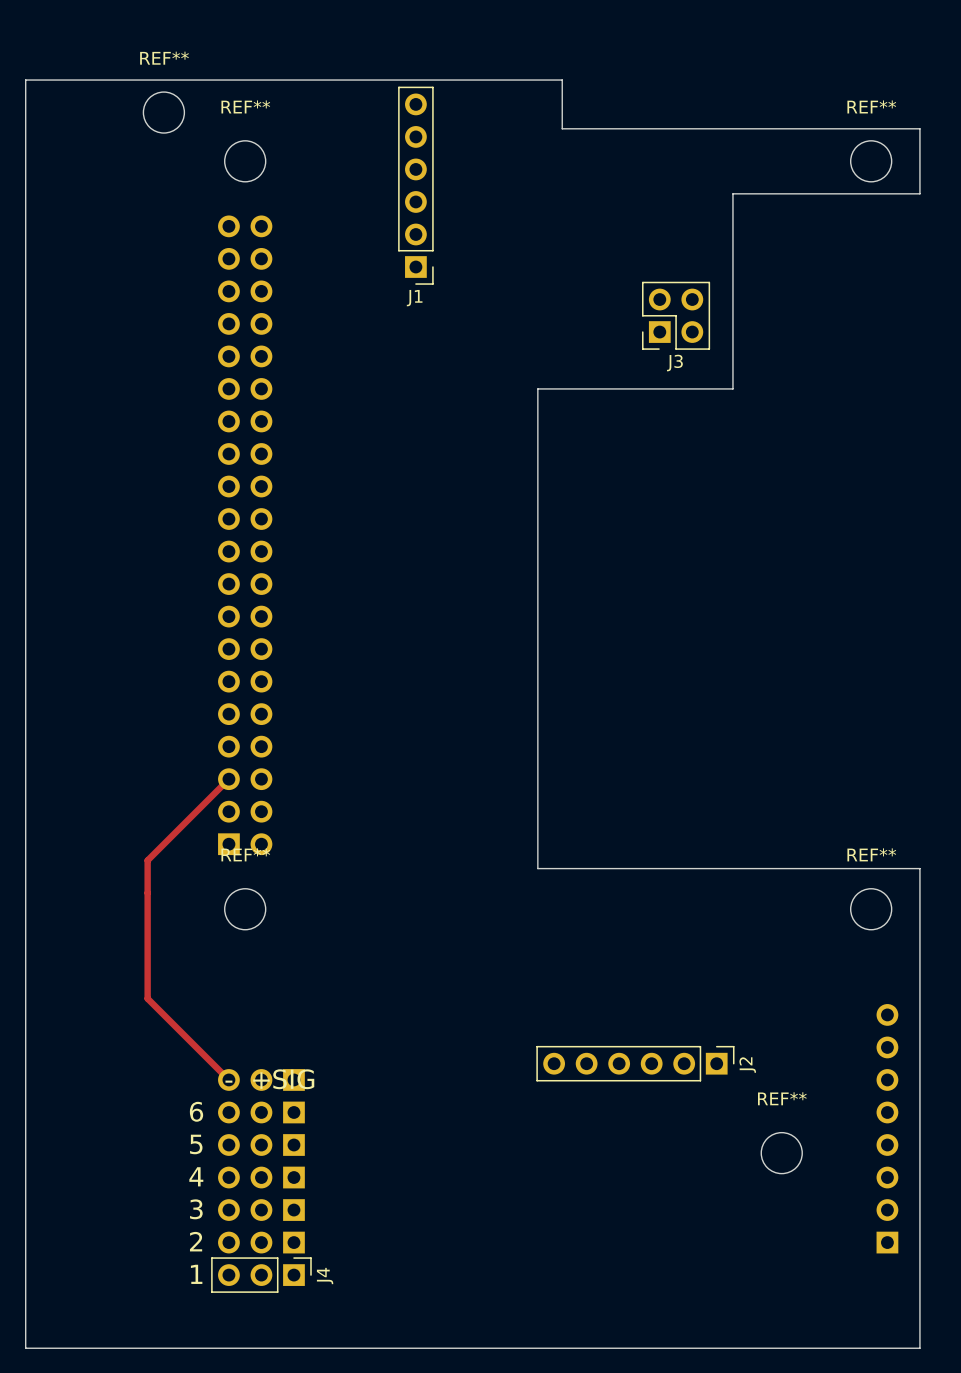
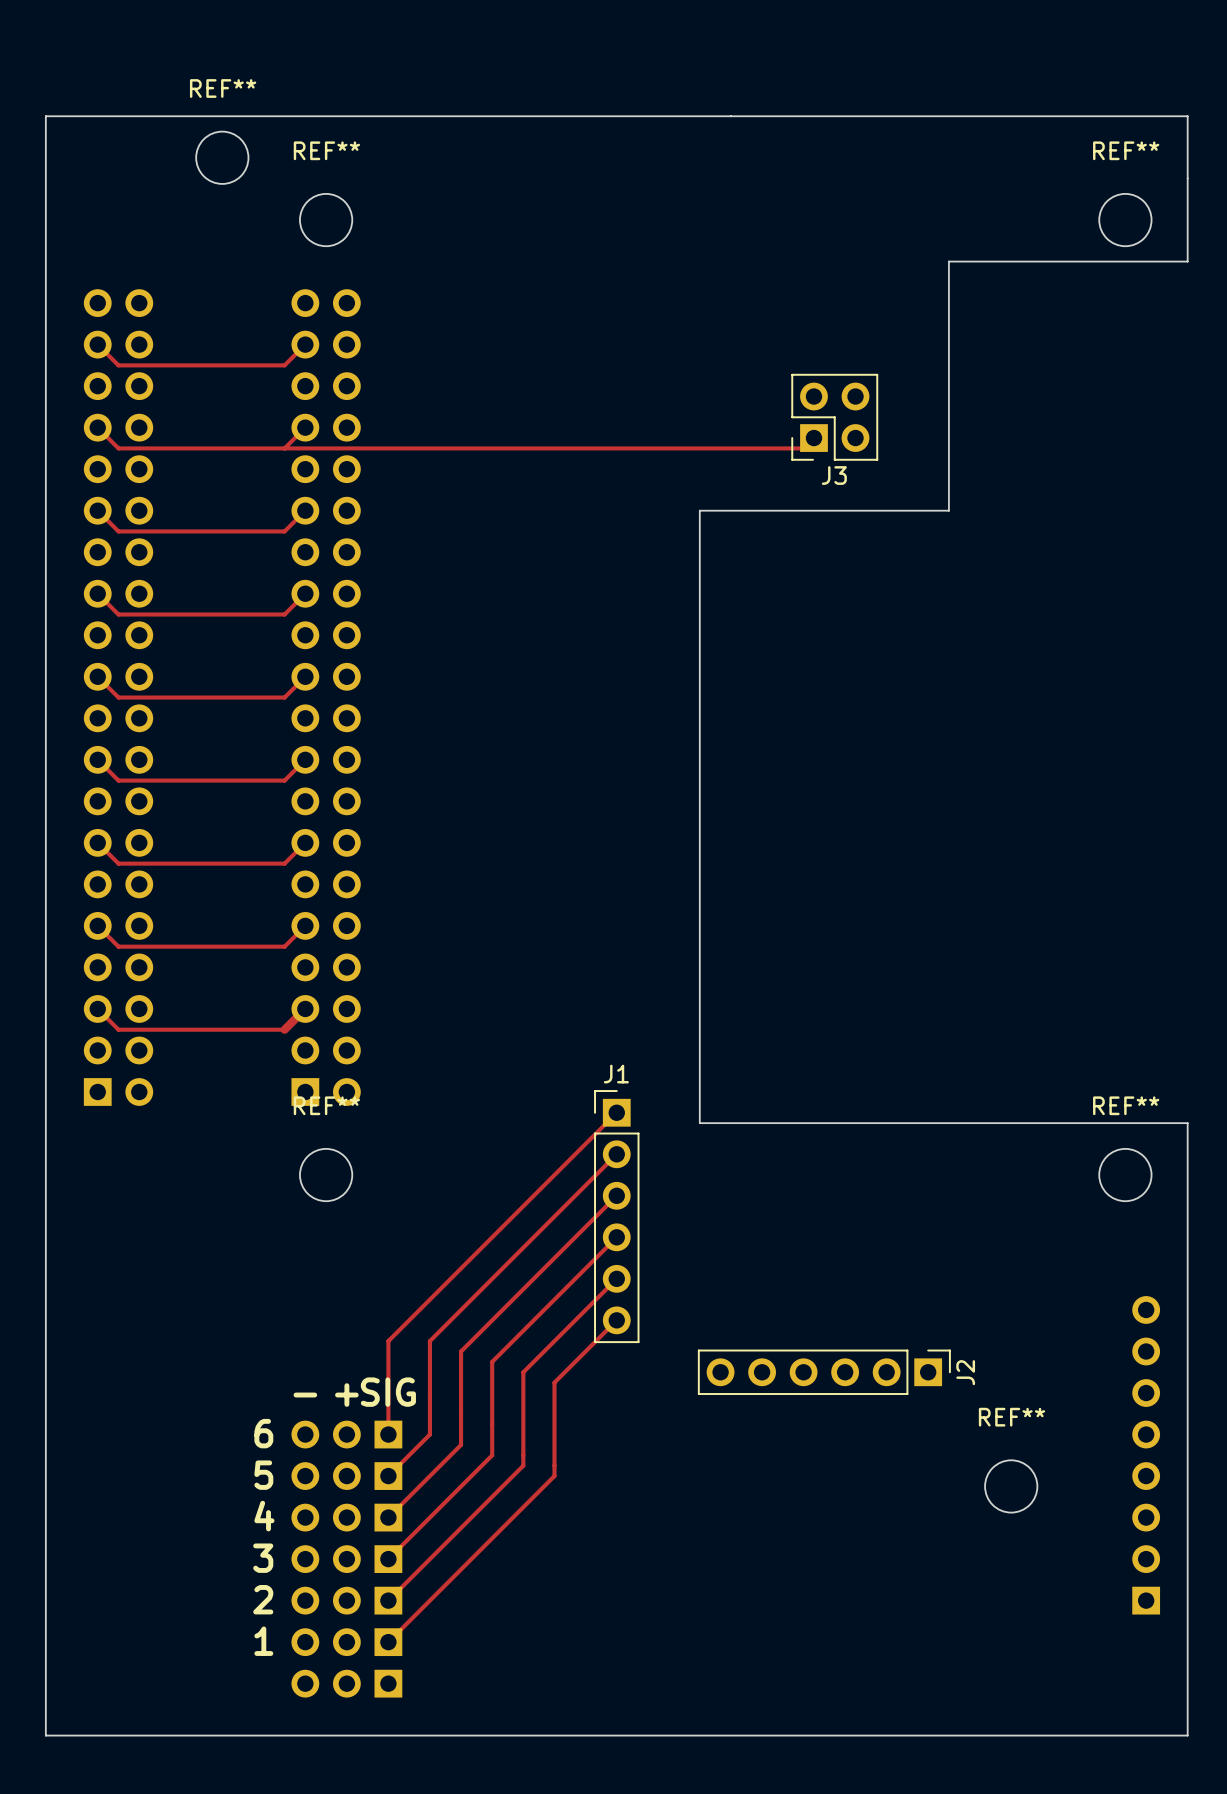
board edge: (562, 80) (562, 128) (919, 128) -> (730, 116) (1187, 116) (1187, 178)
J1 rotation: 0° (415, 185) -> 180° (616, 1216)
J1 position: (415, 185) -> (616, 1216)
track: none -> (97, 344) (118, 365) (284, 365) (305, 344)
J3 position: (676, 315) -> (834, 417)
track: none -> (97, 427) (118, 448) (803, 448) (813, 438)
track: none -> (305, 427) (284, 448)
track: none -> (97, 510) (118, 531) (284, 531) (305, 510)
track: none -> (97, 593) (118, 614) (284, 614) (305, 593)
track: none -> (97, 676) (118, 697) (284, 697) (305, 676)
part: none -> (118, 697)
track: none -> (97, 759) (118, 780) (284, 780) (305, 759)
track: none -> (97, 842) (118, 863) (284, 863) (305, 842)
track: none -> (97, 925) (118, 946) (284, 946) (305, 925)
track: (212, 795) (147, 860) (147, 998) (228, 1079) -> (284, 1029) (118, 1029) (97, 1008)
track: none -> (616, 1112) (388, 1341) (388, 1434)
track: none -> (616, 1154) (429, 1341) (429, 1434) (388, 1476)
track: none -> (616, 1195) (461, 1351) (461, 1444) (388, 1517)
track: none -> (616, 1237) (492, 1361) (492, 1455) (388, 1559)
track: none -> (616, 1278) (523, 1372) (523, 1465) (388, 1600)
track: none -> (616, 1320) (554, 1382) (554, 1476) (388, 1642)
part position: (261, 1079) -> (346, 1642)
J4 side: top (261, 1275) -> bottom (346, 1683)

